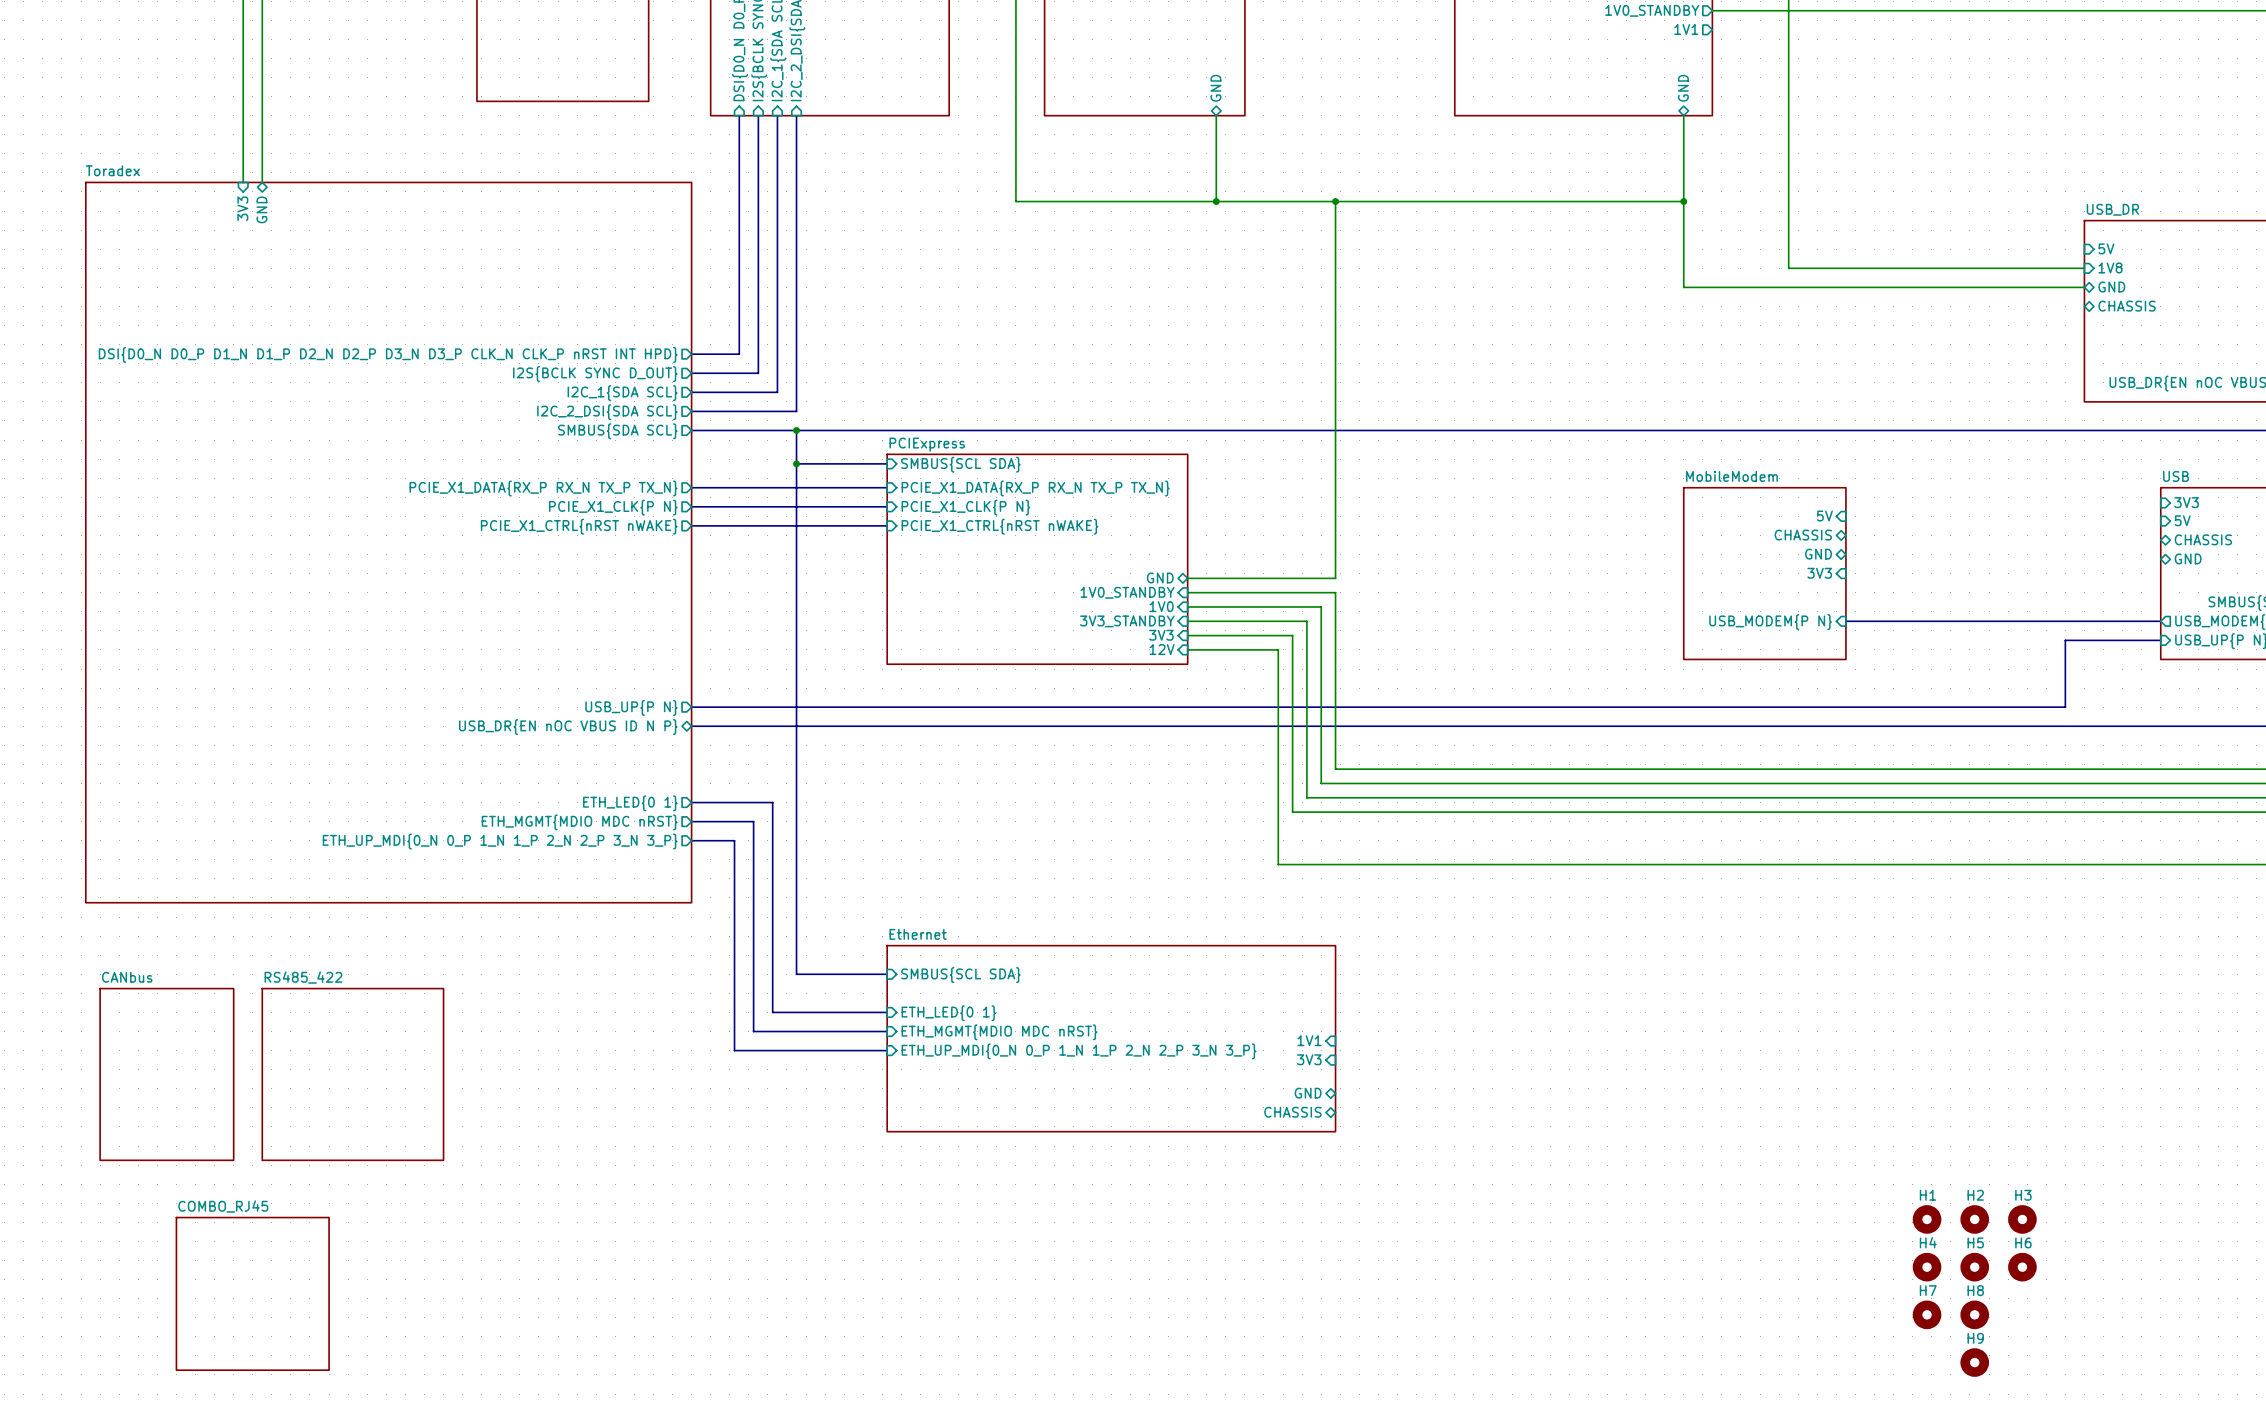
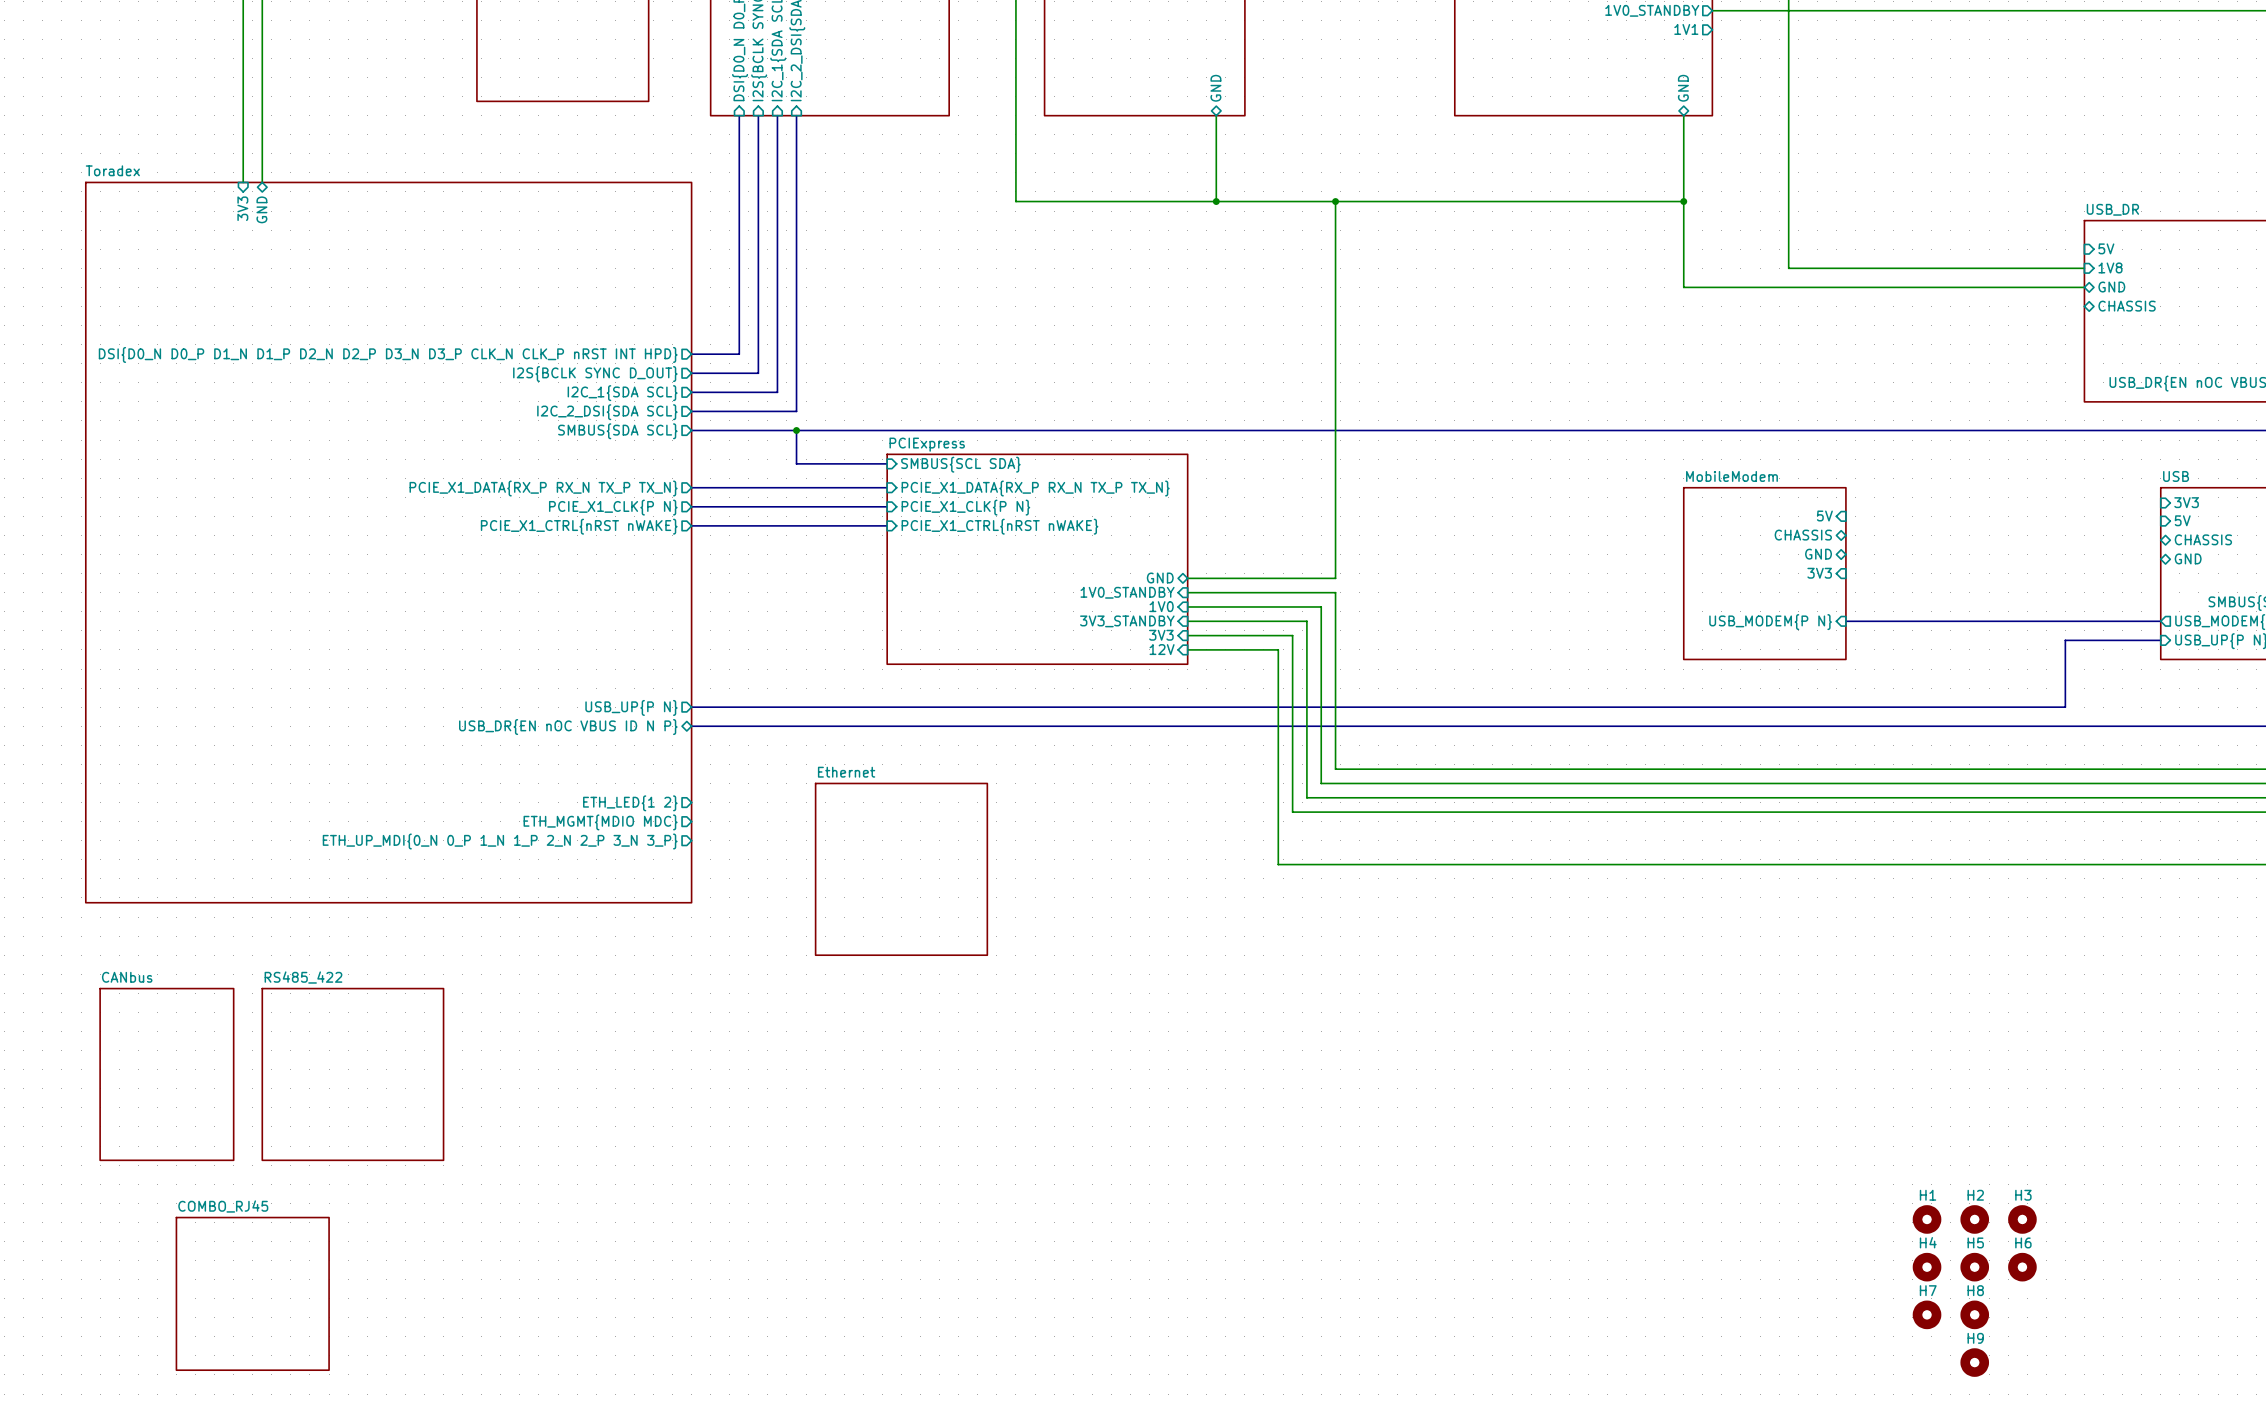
bus: (796, 463) (796, 974) (887, 974) -> none
junction: (796, 463) -> none
bus: (691, 802) (772, 802) (772, 1012) (887, 1012) -> none
sheet pin: ETH_LED{0 1} (630, 803) -> ETH_LED{1 2} (630, 803)
bus: (691, 821) (753, 821) (753, 1031) (887, 1031) -> none
sheet pin: ETH_MGMT{MDIO MDC nRST} (579, 822) -> ETH_MGMT{MDIO MDC} (600, 822)
bus: (691, 840) (734, 840) (734, 1050) (887, 1050) -> none
sheet Ethernet: none -> (901, 869)
sheet pin: SMBUS{SCL SDA} (960, 975) -> none
sheet pin: ETH_LED{0 1} (948, 1013) -> none
sheet pin: ETH_MGMT{MDIO MDC nRST} (999, 1032) -> none
sheet Ethernet: (1111, 1038) -> none
sheet pin: 1V1 (1309, 1040) -> none
sheet pin: ETH_UP_MDI{0_N 0_P 1_N 1_P 2_N 2_P 3_N 3_P} (1079, 1051) -> none
sheet pin: 3V3 (1309, 1059) -> none
sheet pin: GND (1308, 1093) -> none
sheet pin: CHASSIS (1292, 1112) -> none

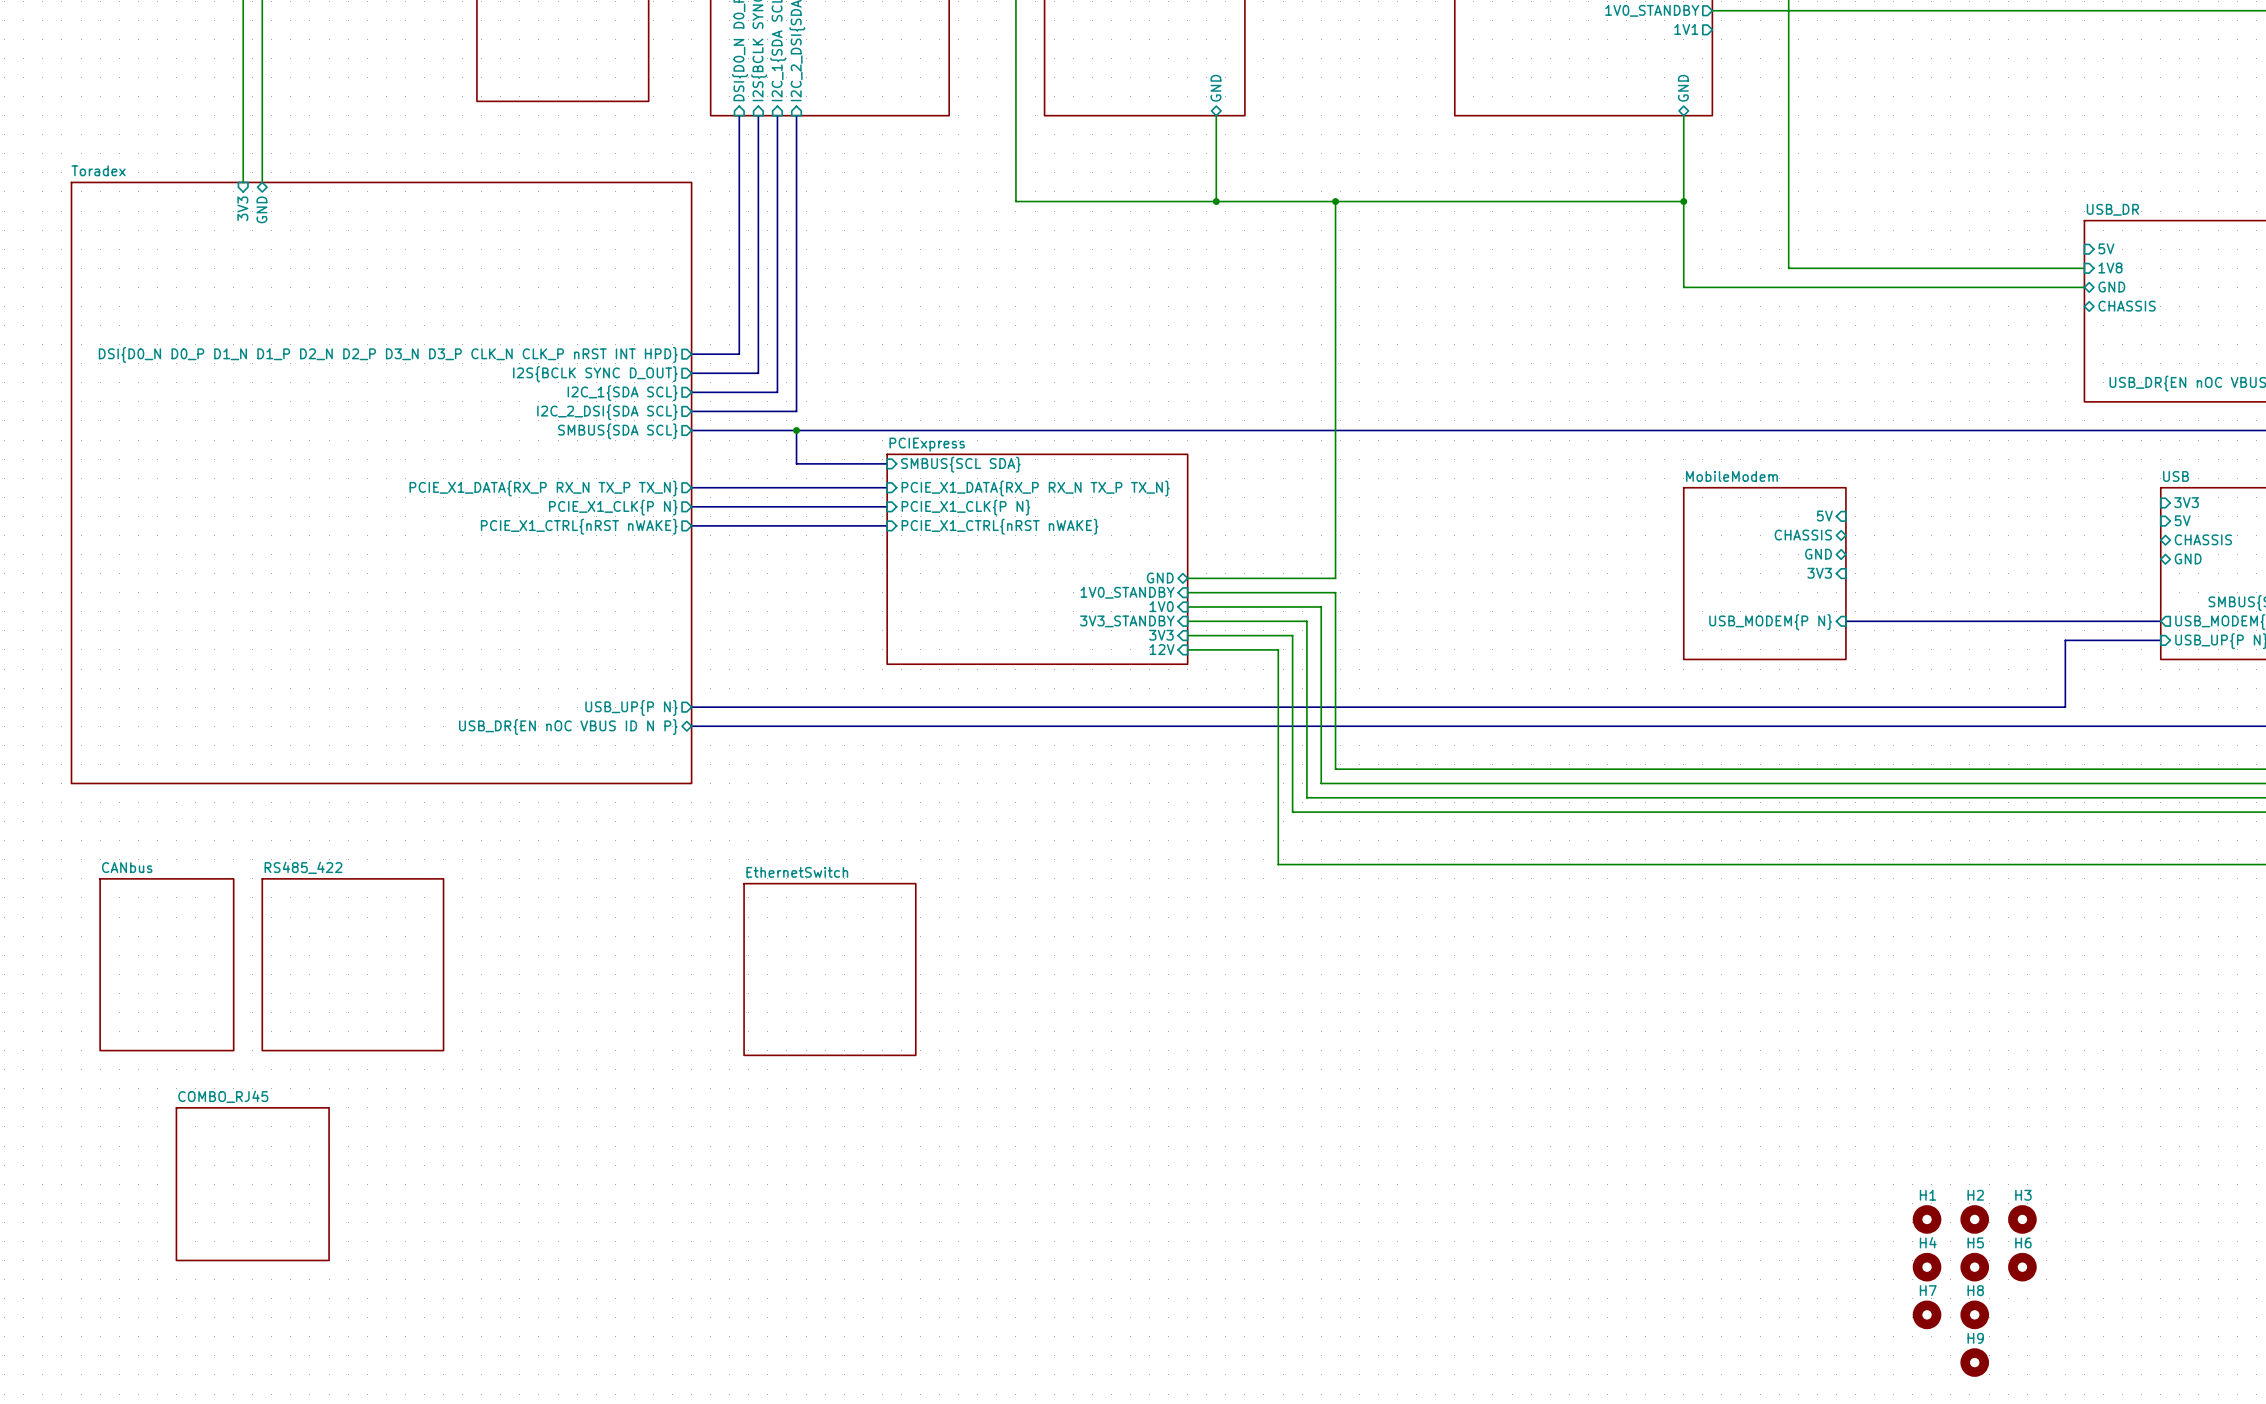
sheet Toradex: none -> (381, 482)
sheet Toradex: (388, 542) -> none
sheet pin: ETH_LED{1 2} (630, 803) -> none
sheet pin: ETH_MGMT{MDIO MDC} (600, 822) -> none
sheet pin: ETH_UP_MDI{0_N 0_P 1_N 1_P 2_N 2_P 3_N 3_P} (500, 841) -> none
sheet Ethernet: (901, 869) -> none
sheet EthernetSwitch: none -> (829, 969)
sheet CANbus position: (166, 1074) -> (166, 964)
sheet RS485_422 position: (352, 1074) -> (352, 964)
sheet COMBO_RJ45 position: (252, 1293) -> (252, 1184)

